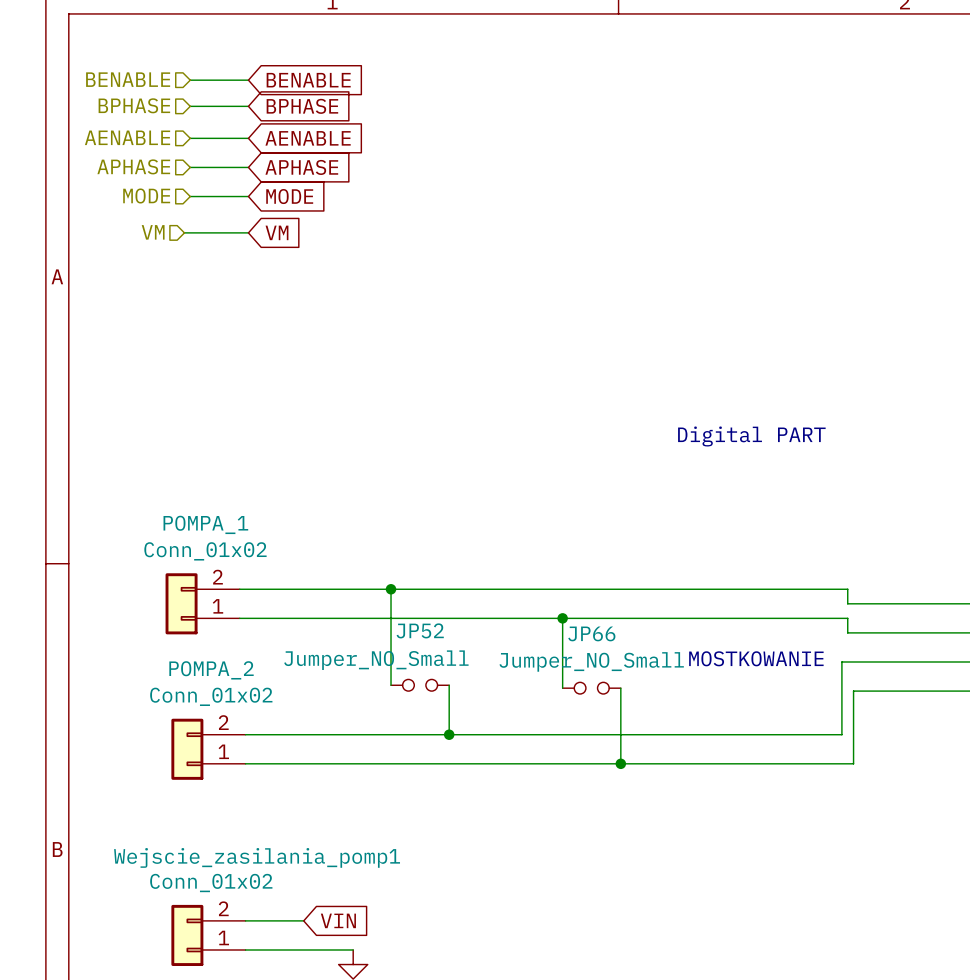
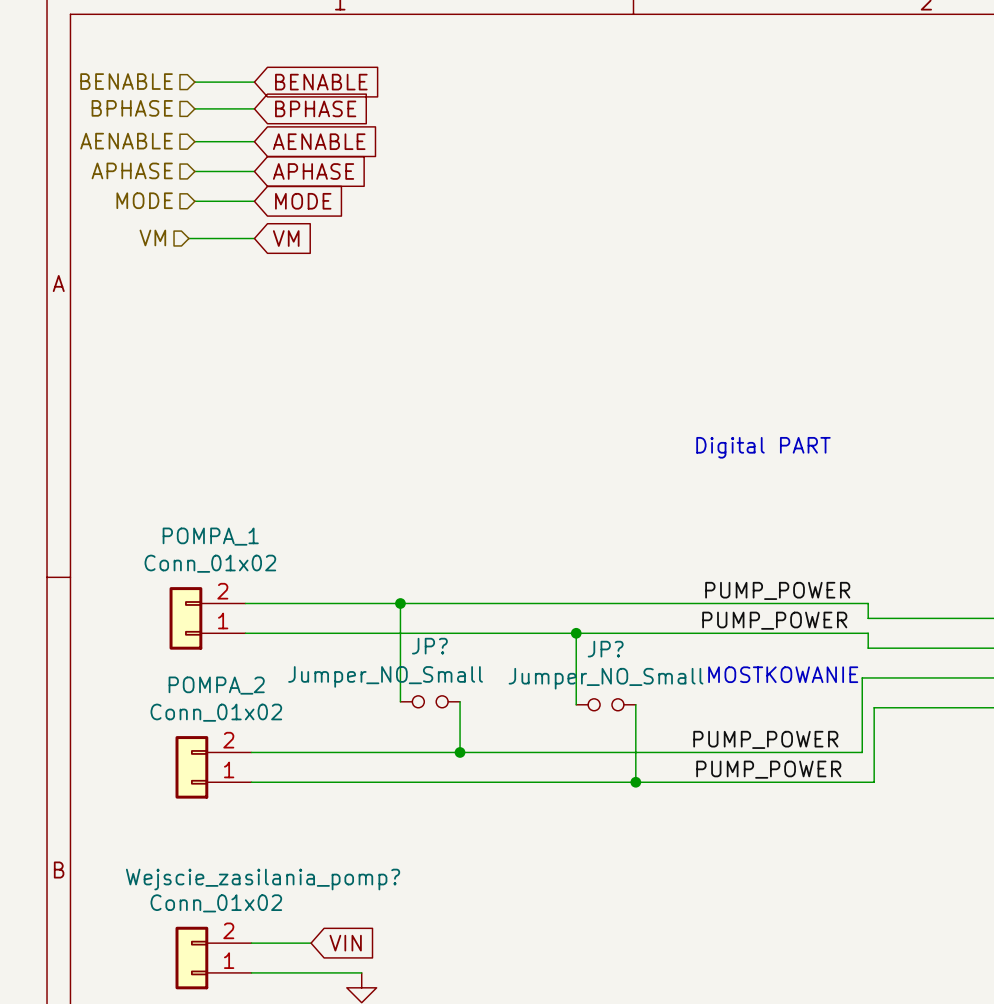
label: none -> PUMP_POWER (777, 590)
label: none -> PUMP_POWER (774, 620)
JP52 name: JP52 (420, 630) -> JP? (429, 646)
JP66 name: JP66 (591, 633) -> JP? (605, 649)
label: none -> PUMP_POWER (765, 739)
label: none -> PUMP_POWER (768, 769)
Wejscie_zasilania_pomp1 name: Wejscie_zasilania_pomp1 (257, 857) -> Wejscie_zasilania_pomp? (263, 879)

